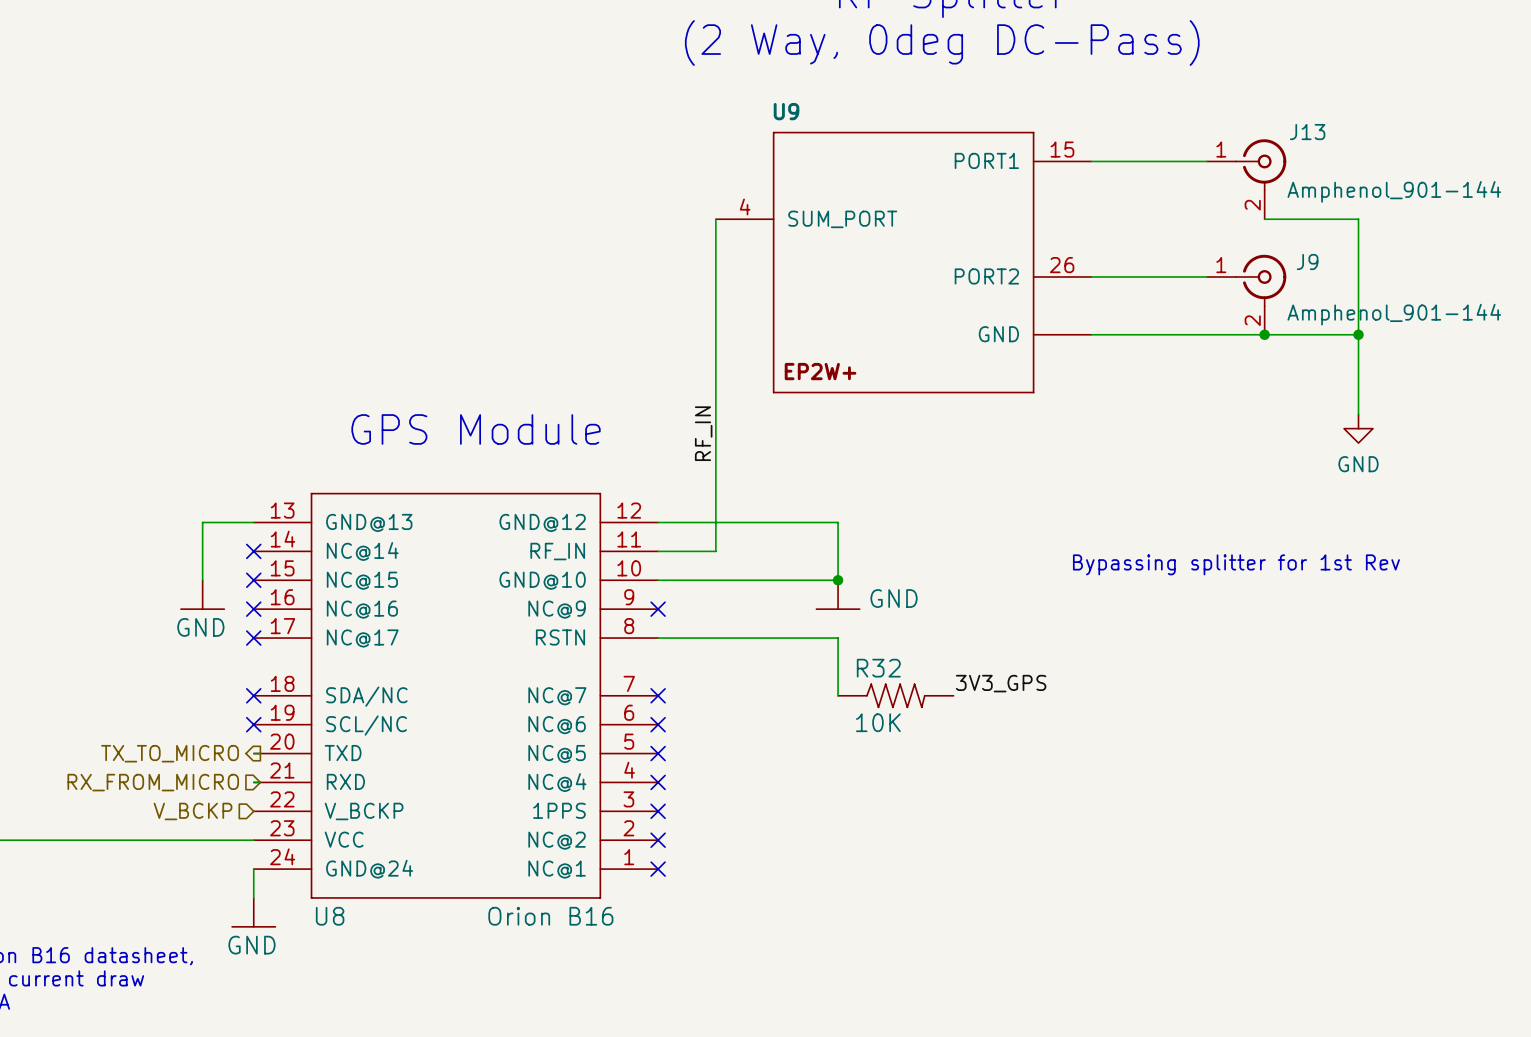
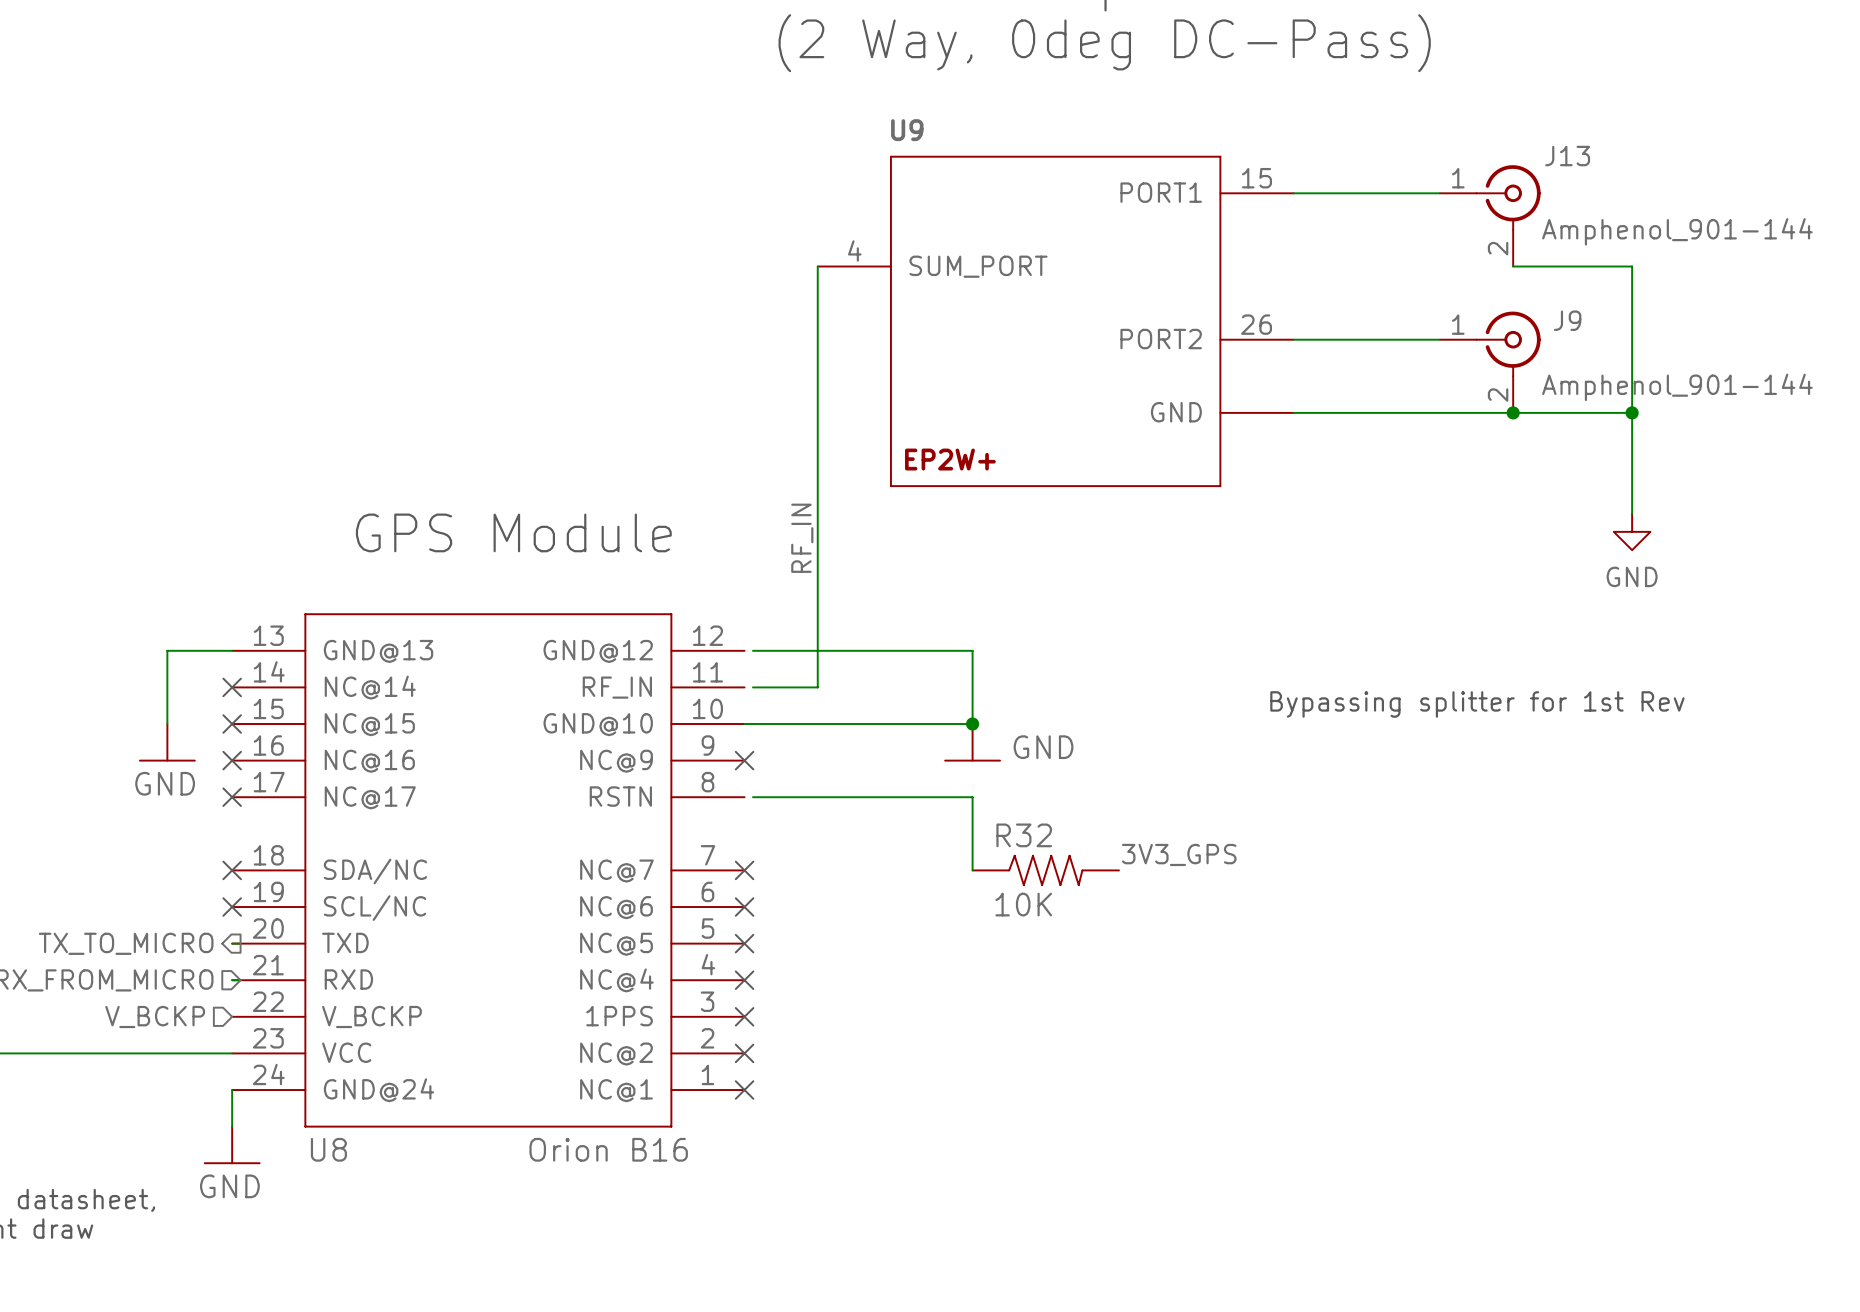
wire: (658, 522) (664, 522) -> none
wire: (658, 551) (664, 551) -> none
wire: (658, 638) (664, 638) -> none

